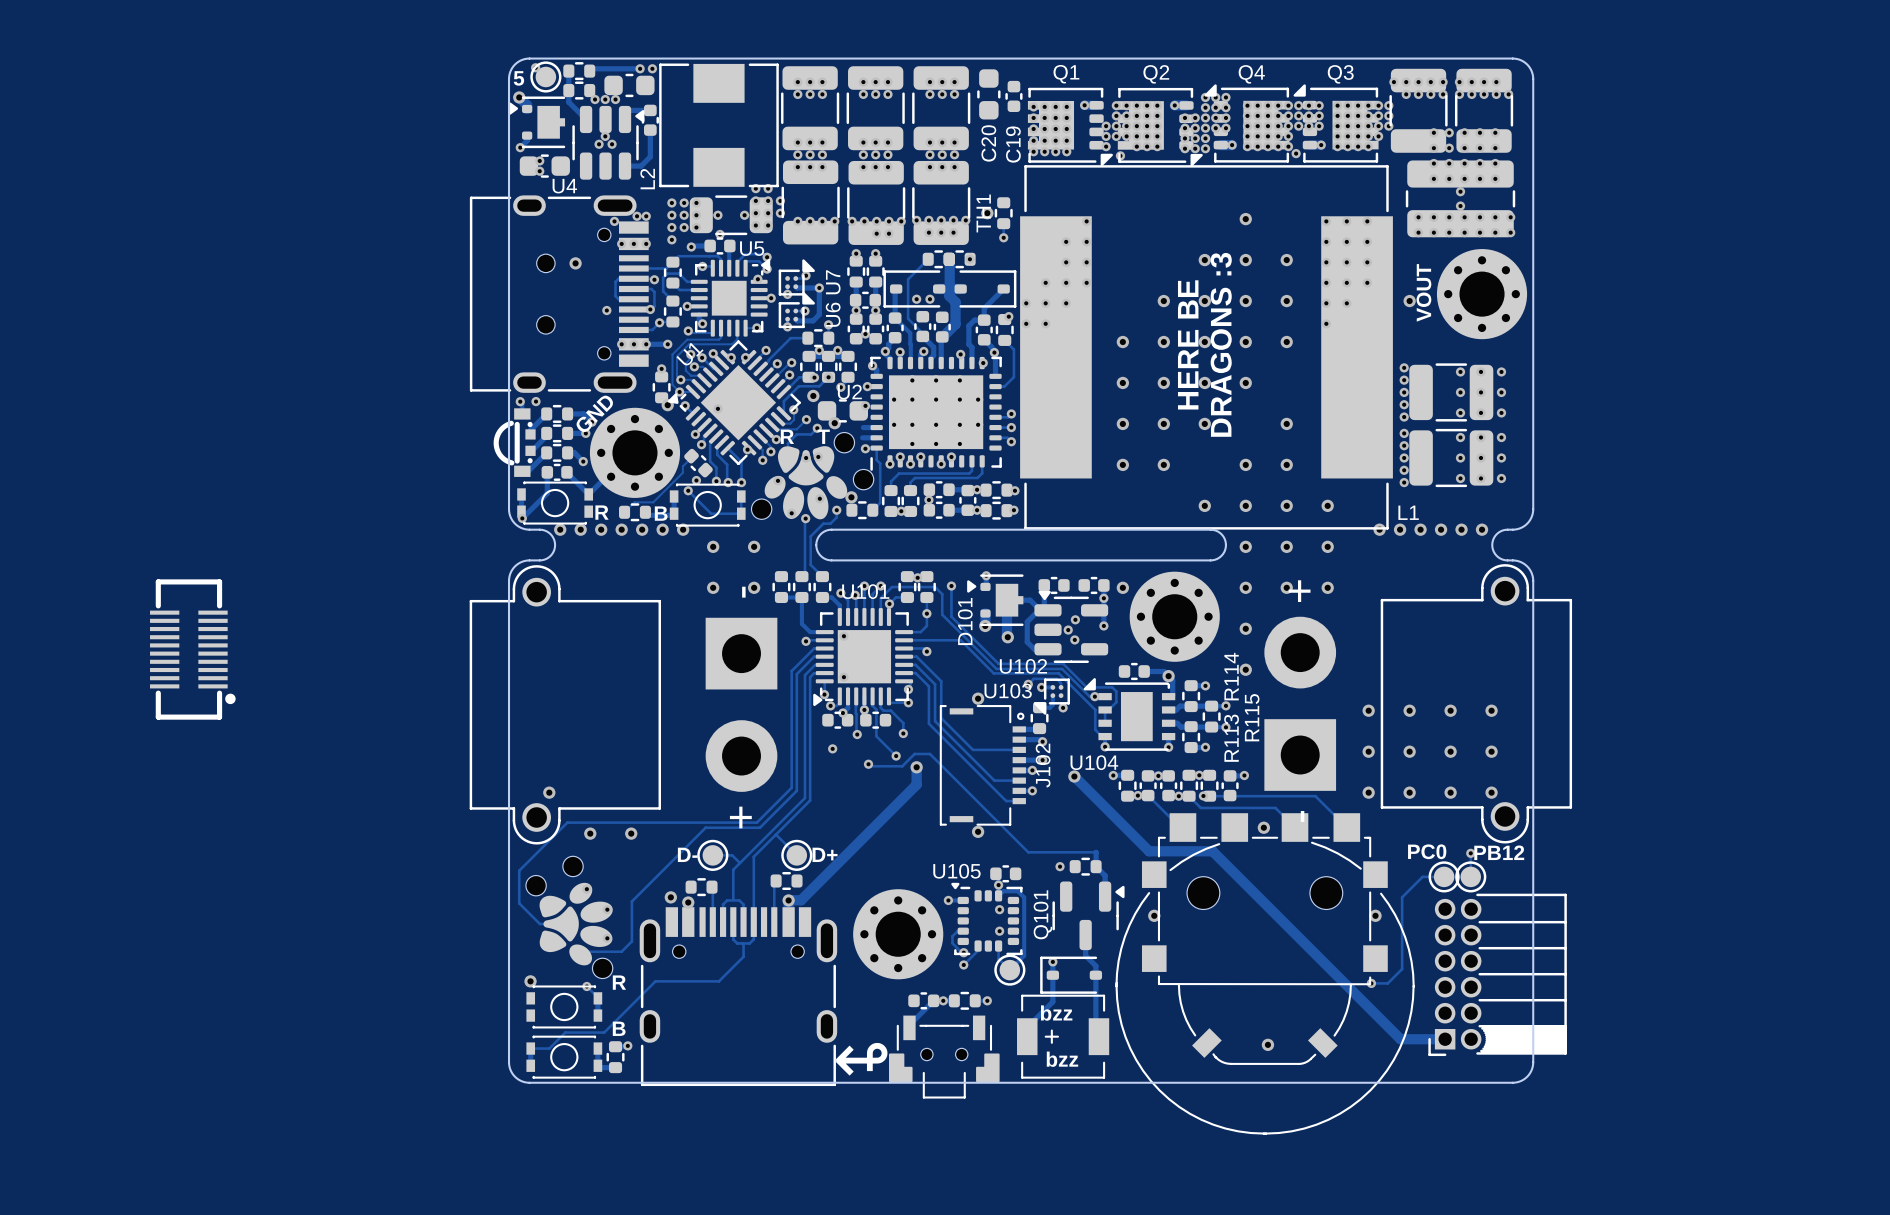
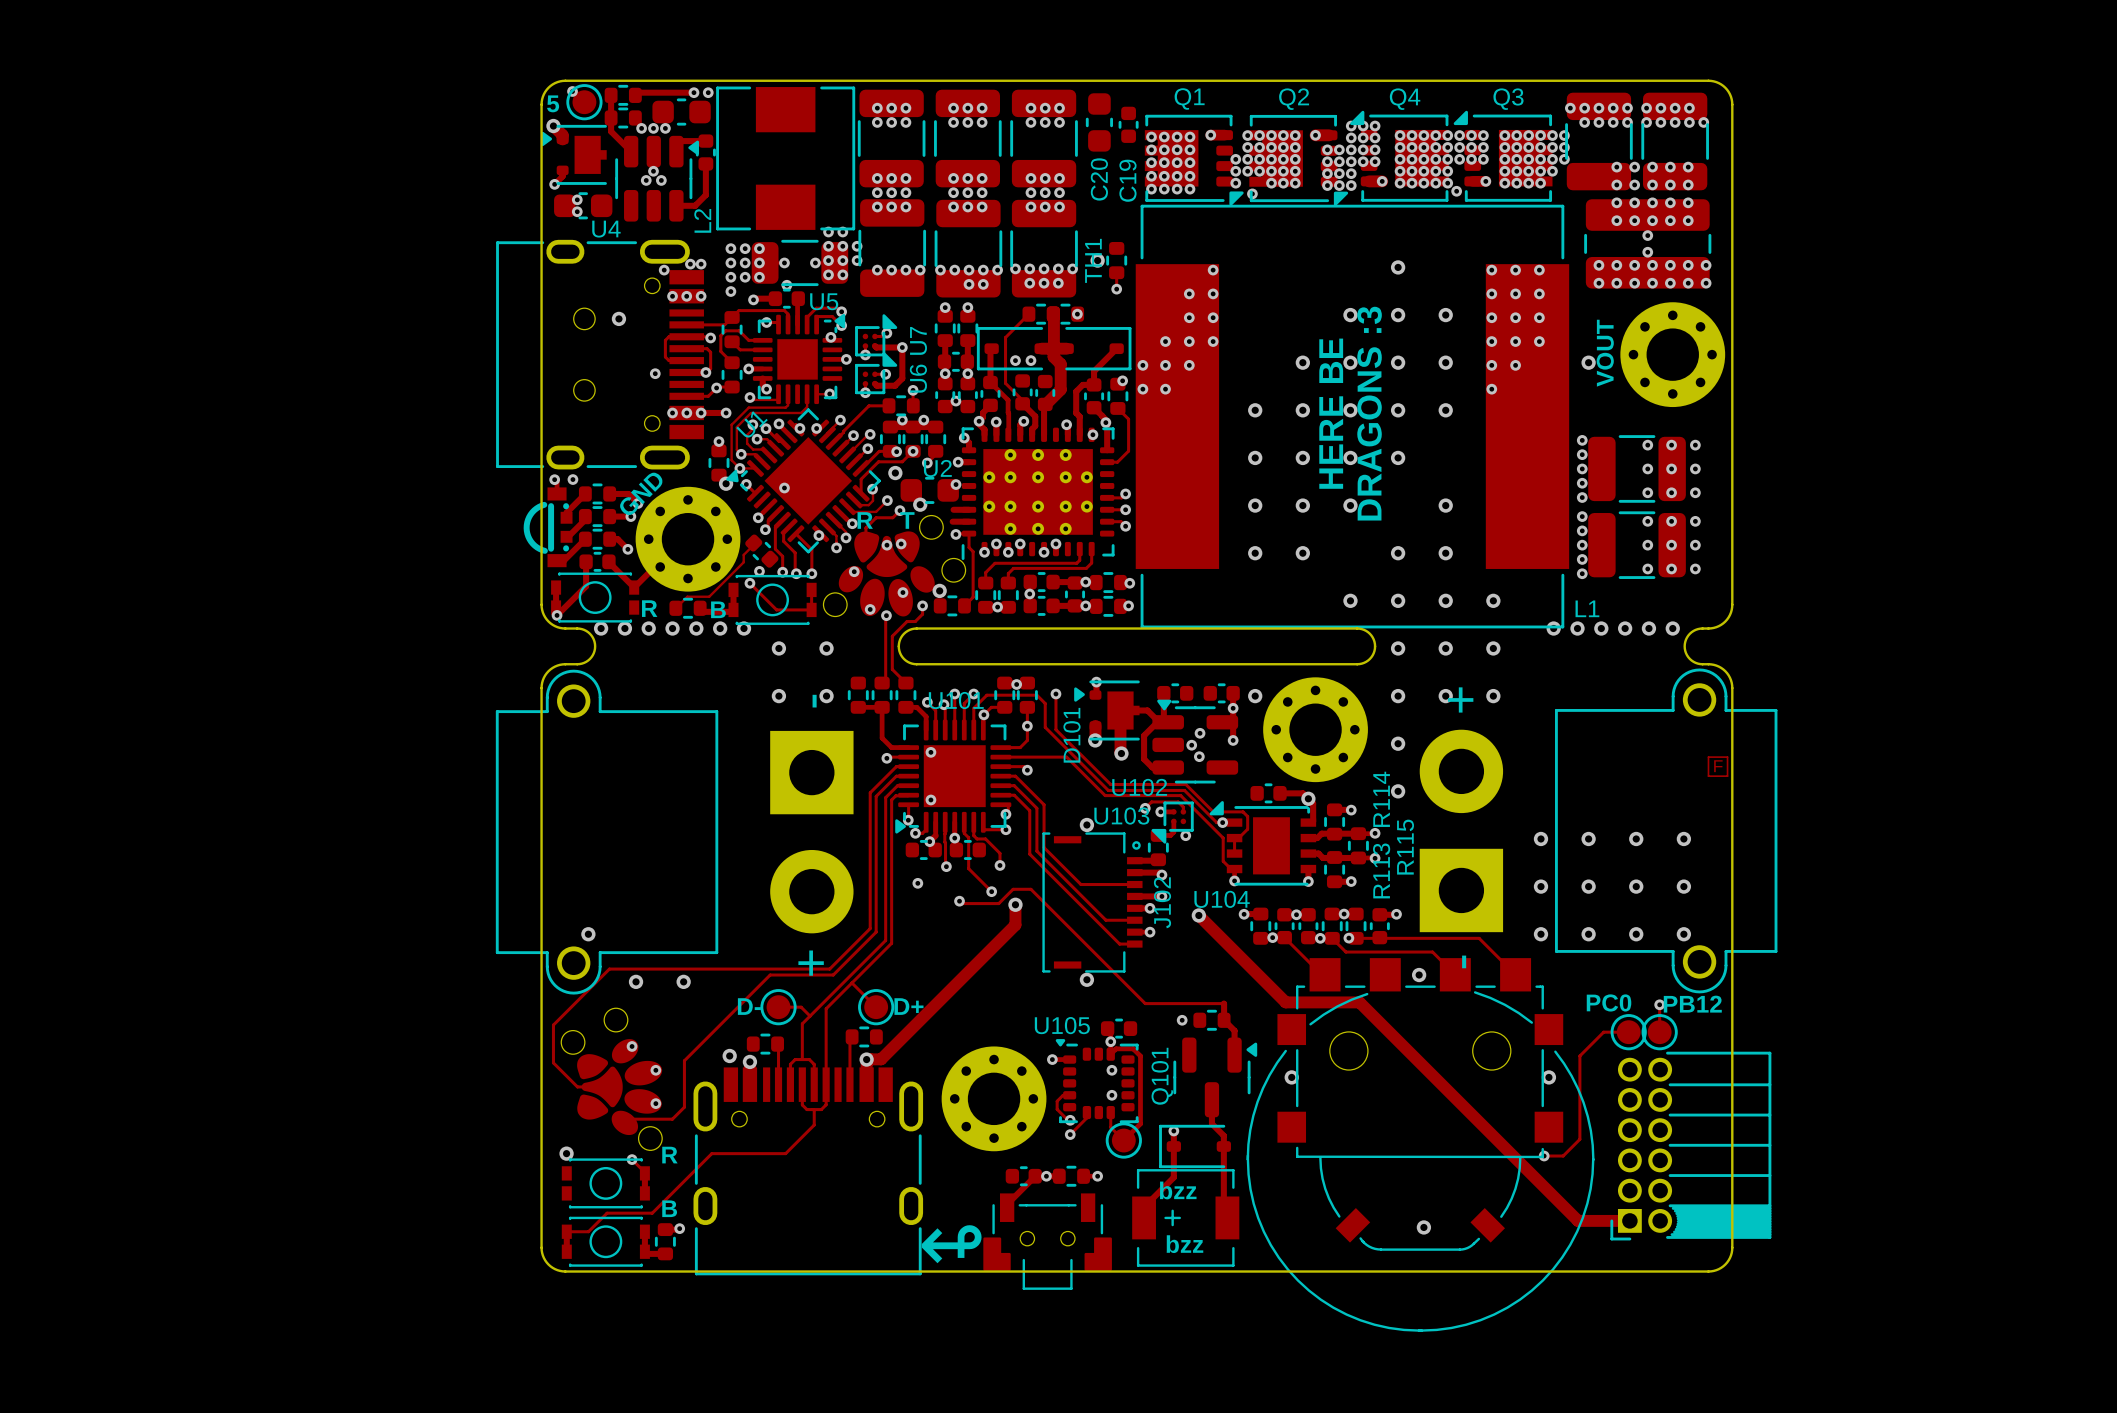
track: none -> (1708, 757) (1727, 757) (1727, 776) (1708, 776) (1708, 757)
text: none -> F (1718, 766)
part: (192, 649) -> none

